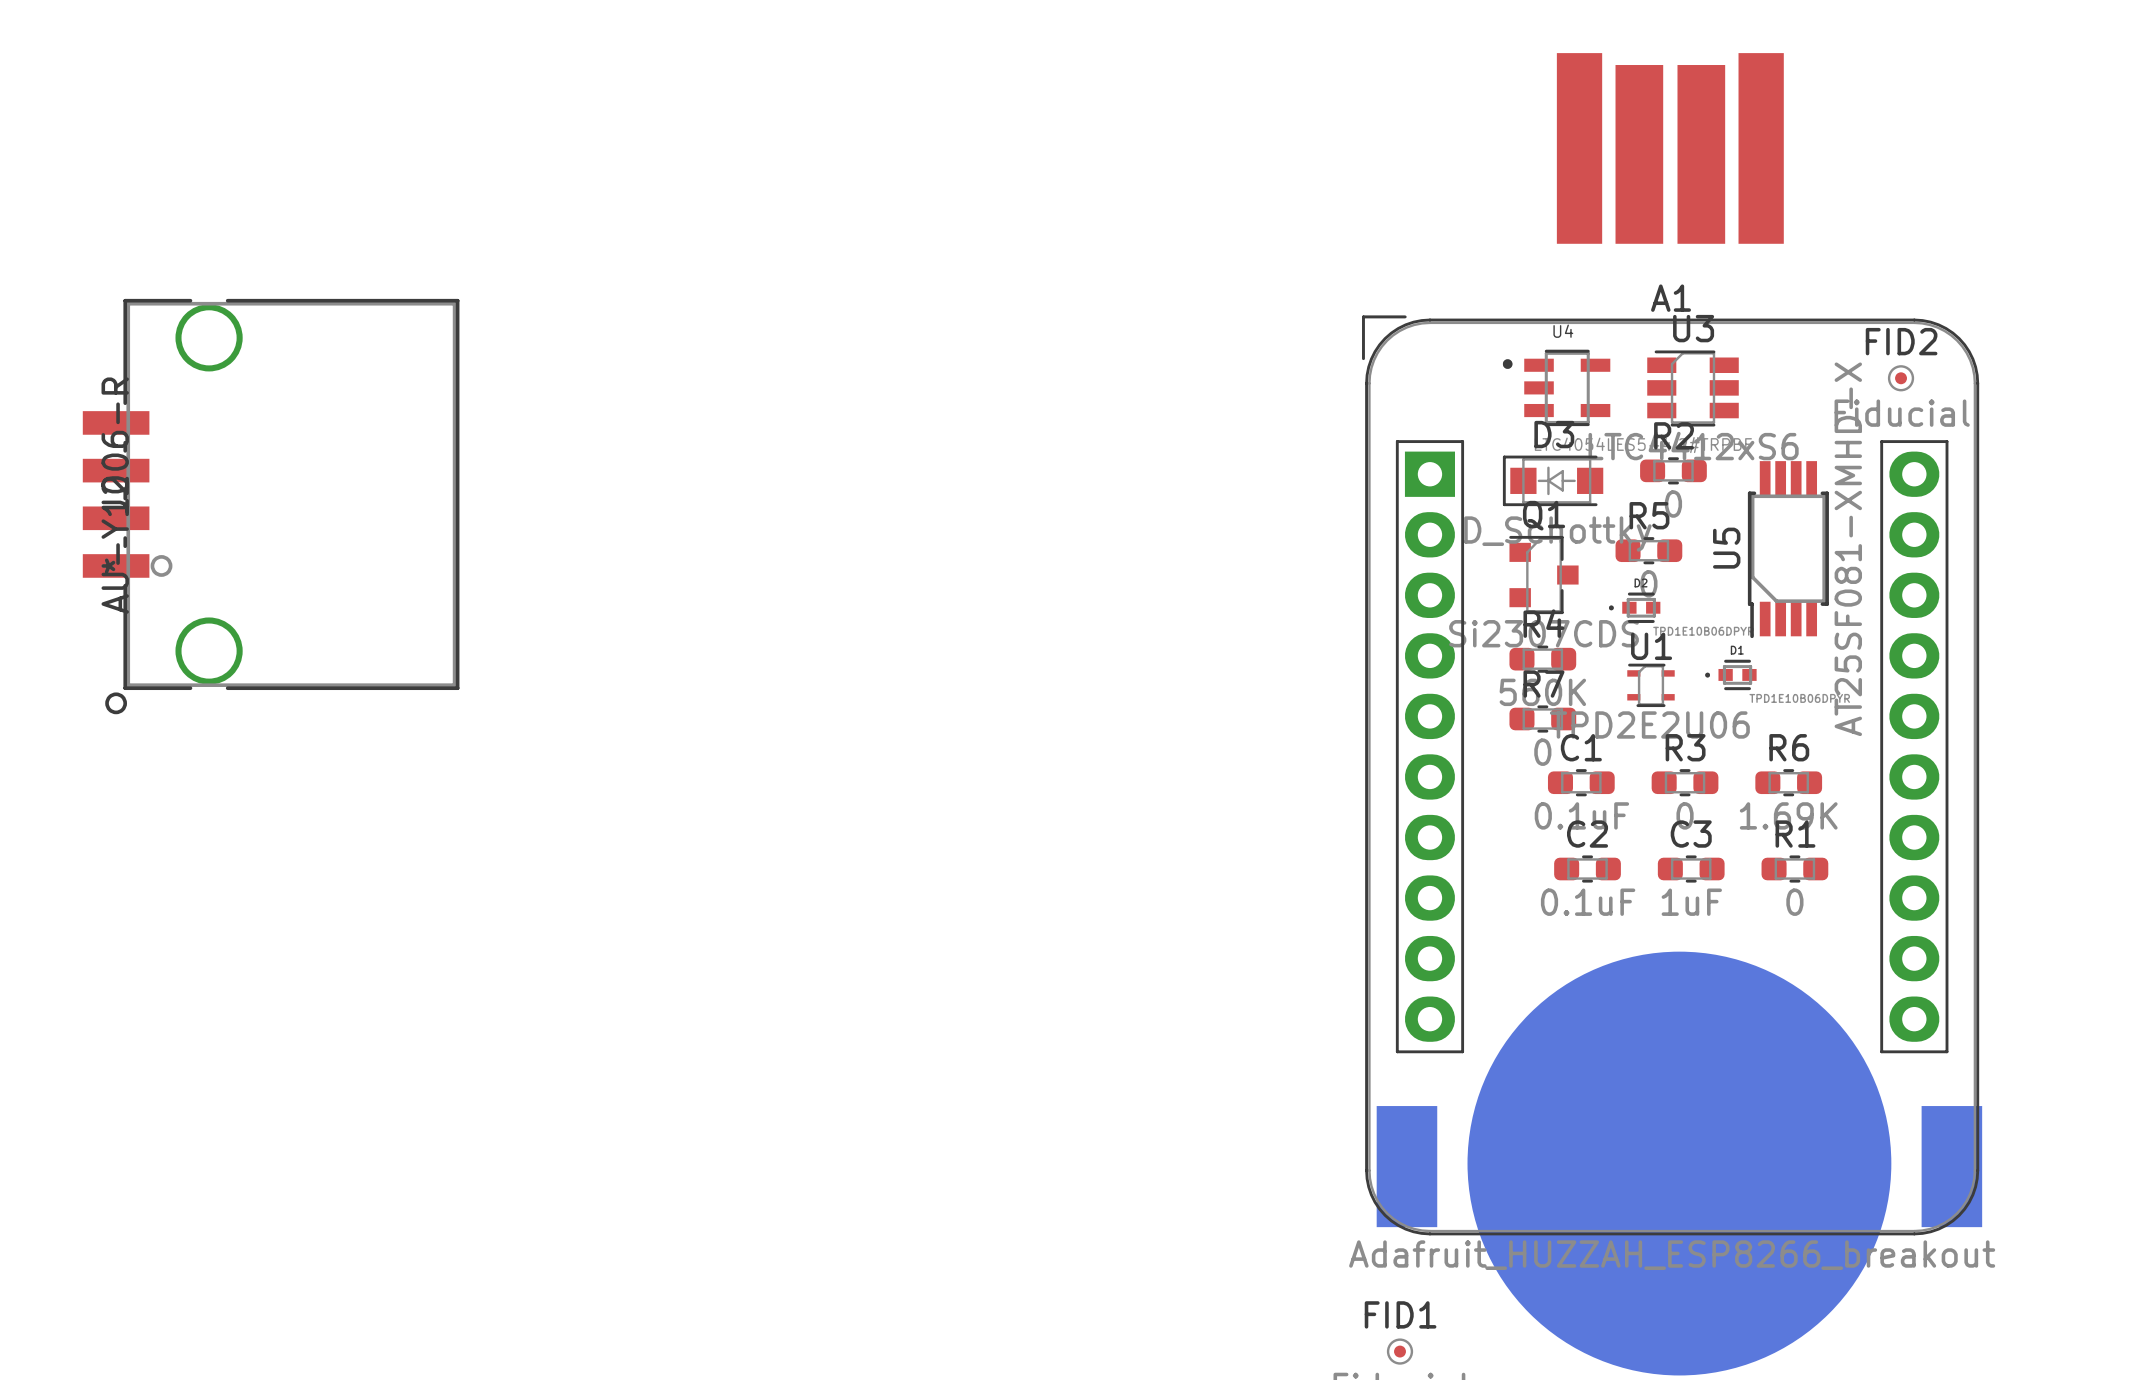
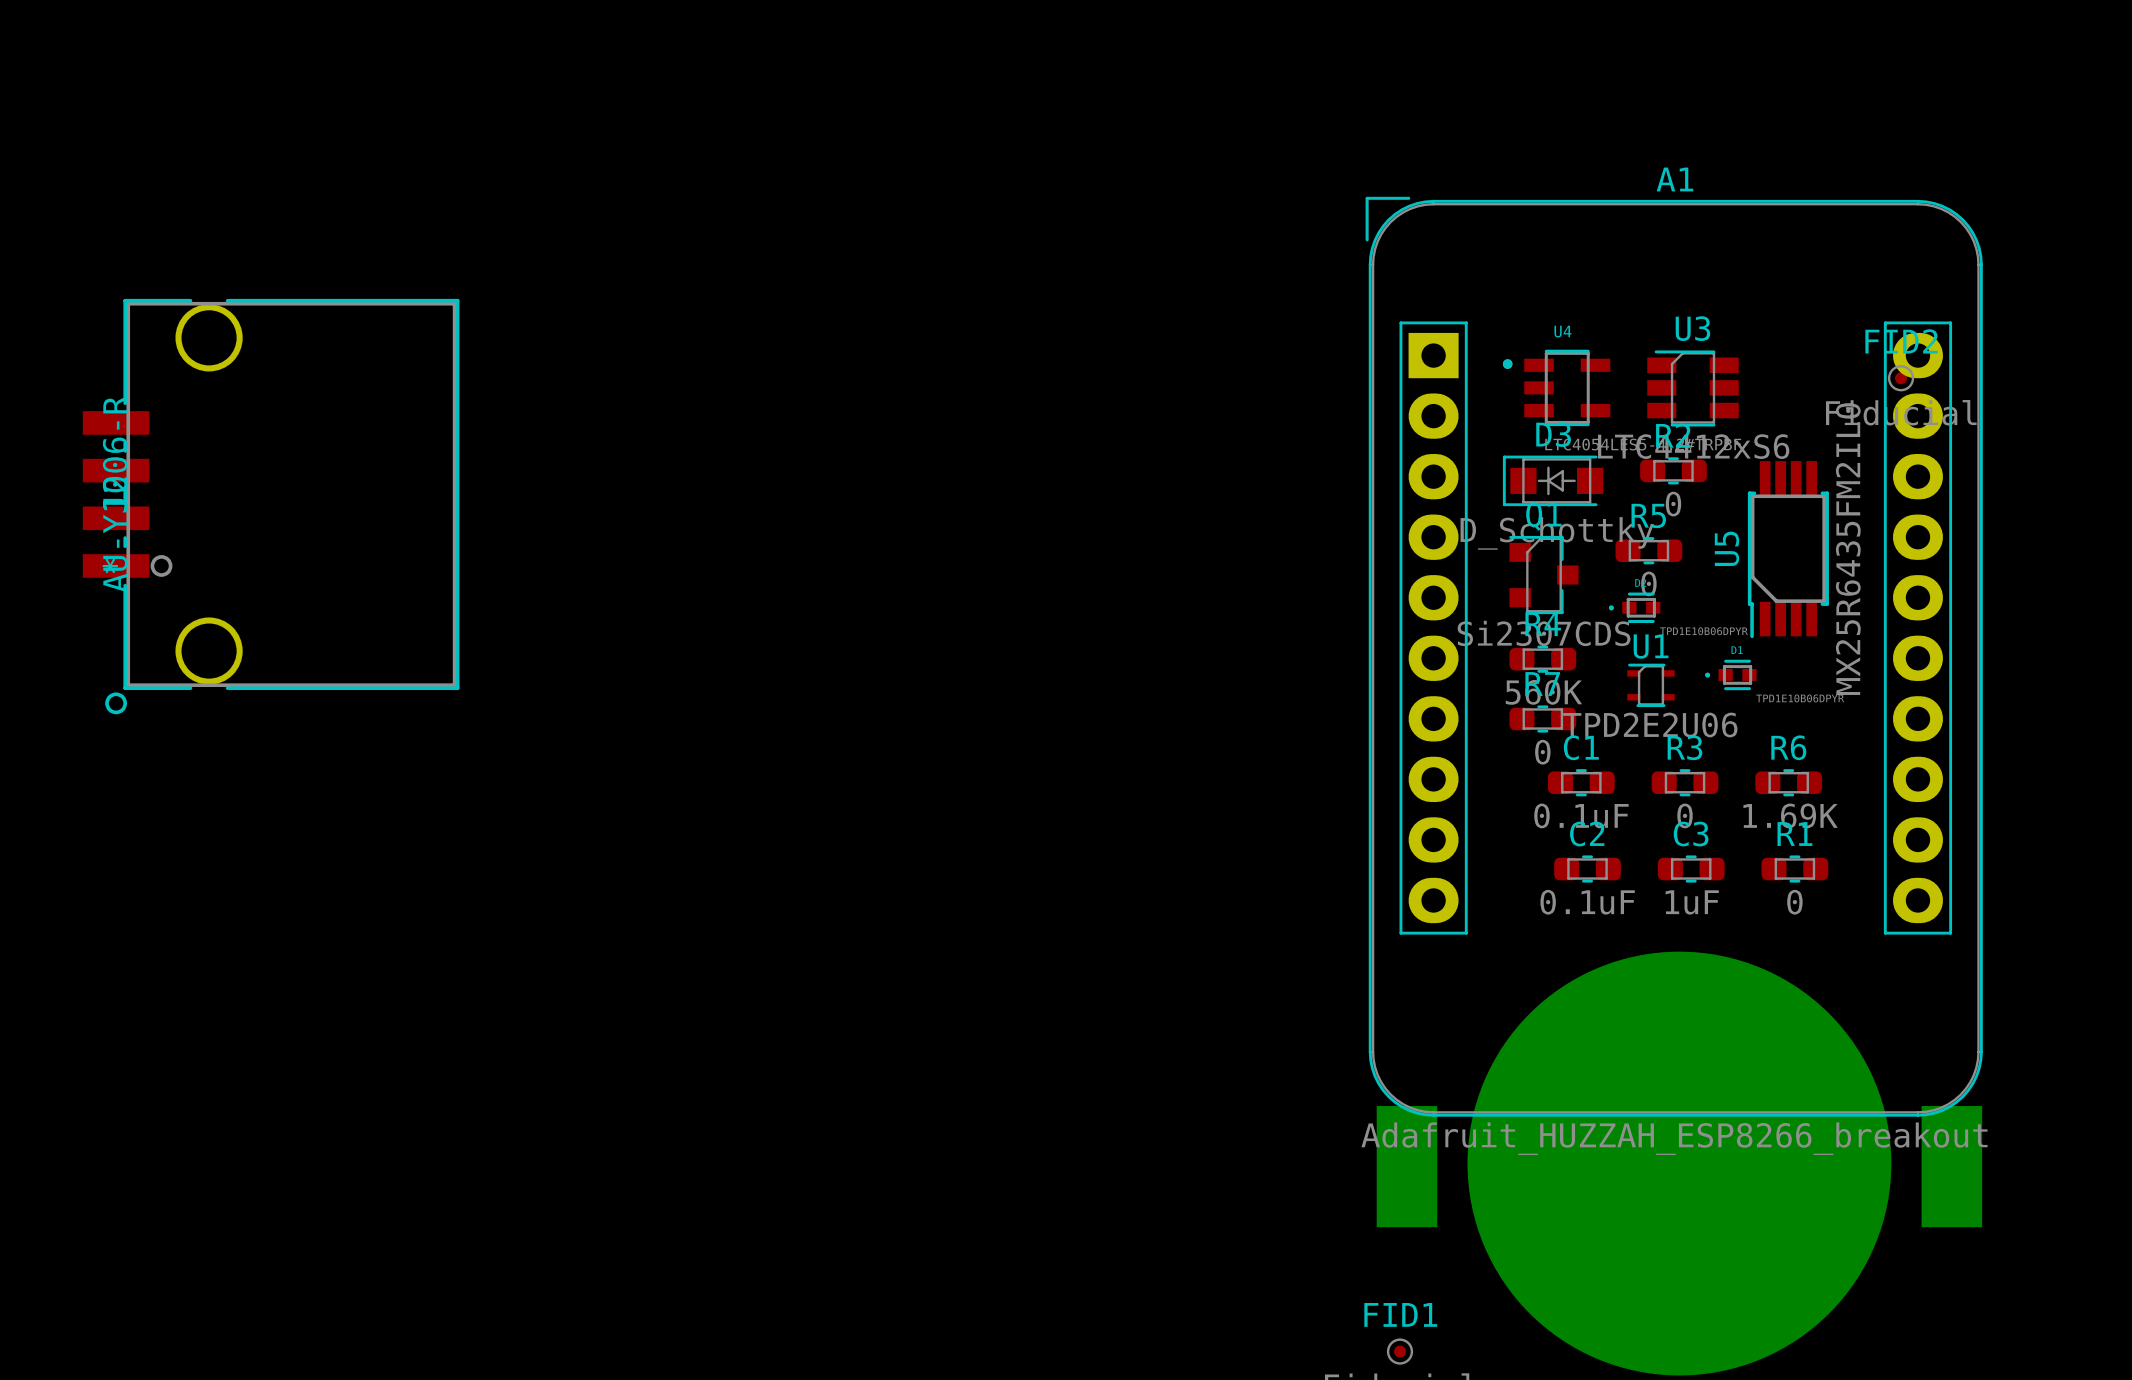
part: (1670, 148) -> none
U5 value: AT25SF081-XMHD-X (1848, 549) -> MX25R6435FM2IL0 (1848, 549)
A1 position: (1670, 775) -> (1674, 656)

